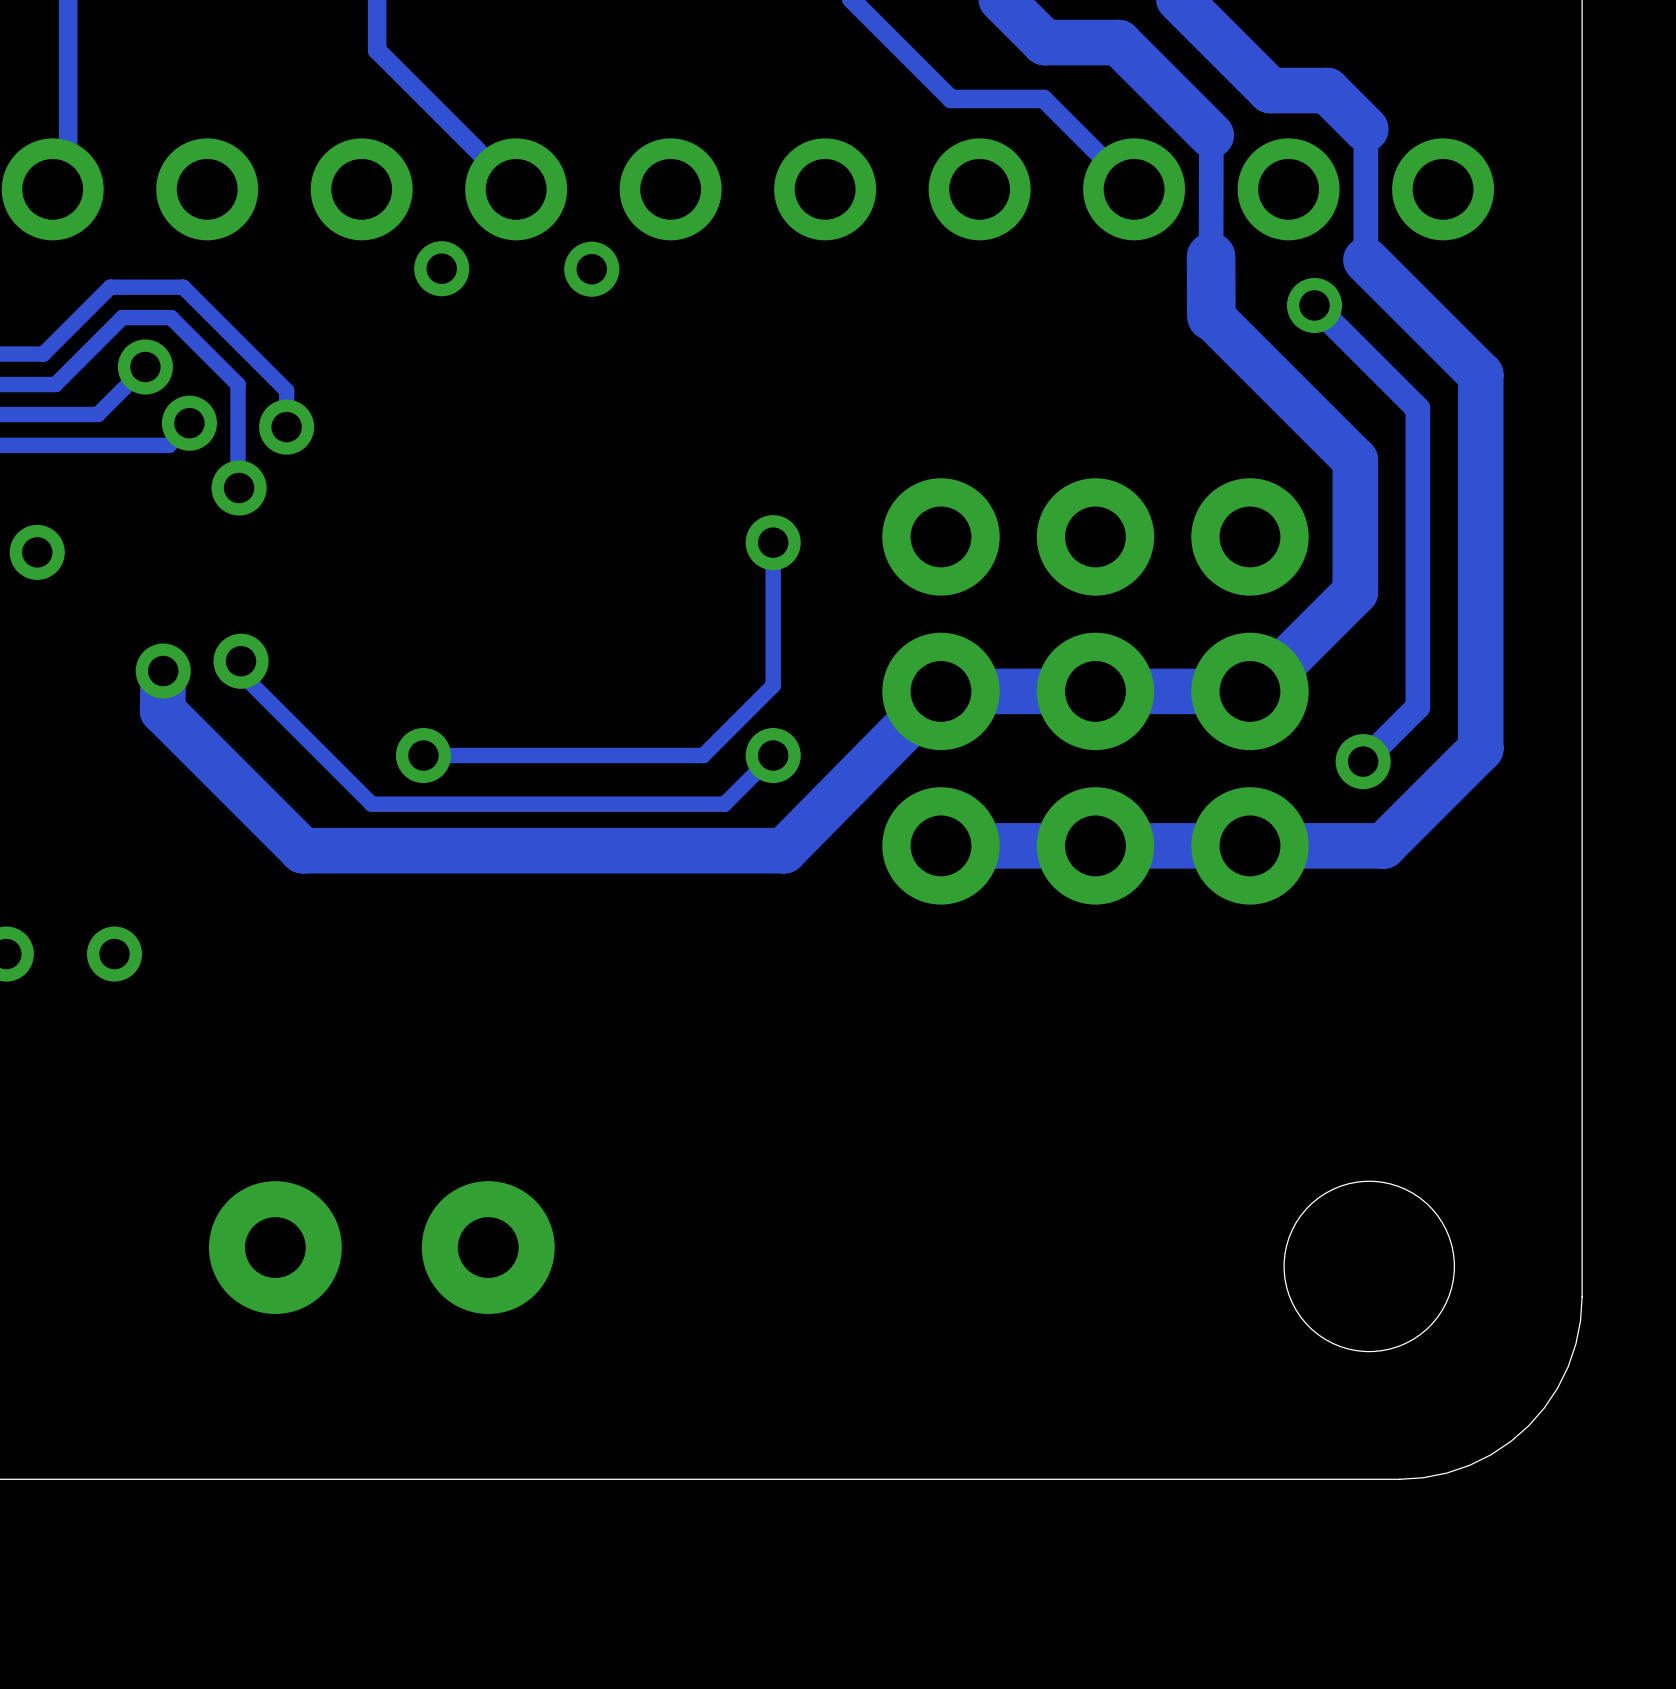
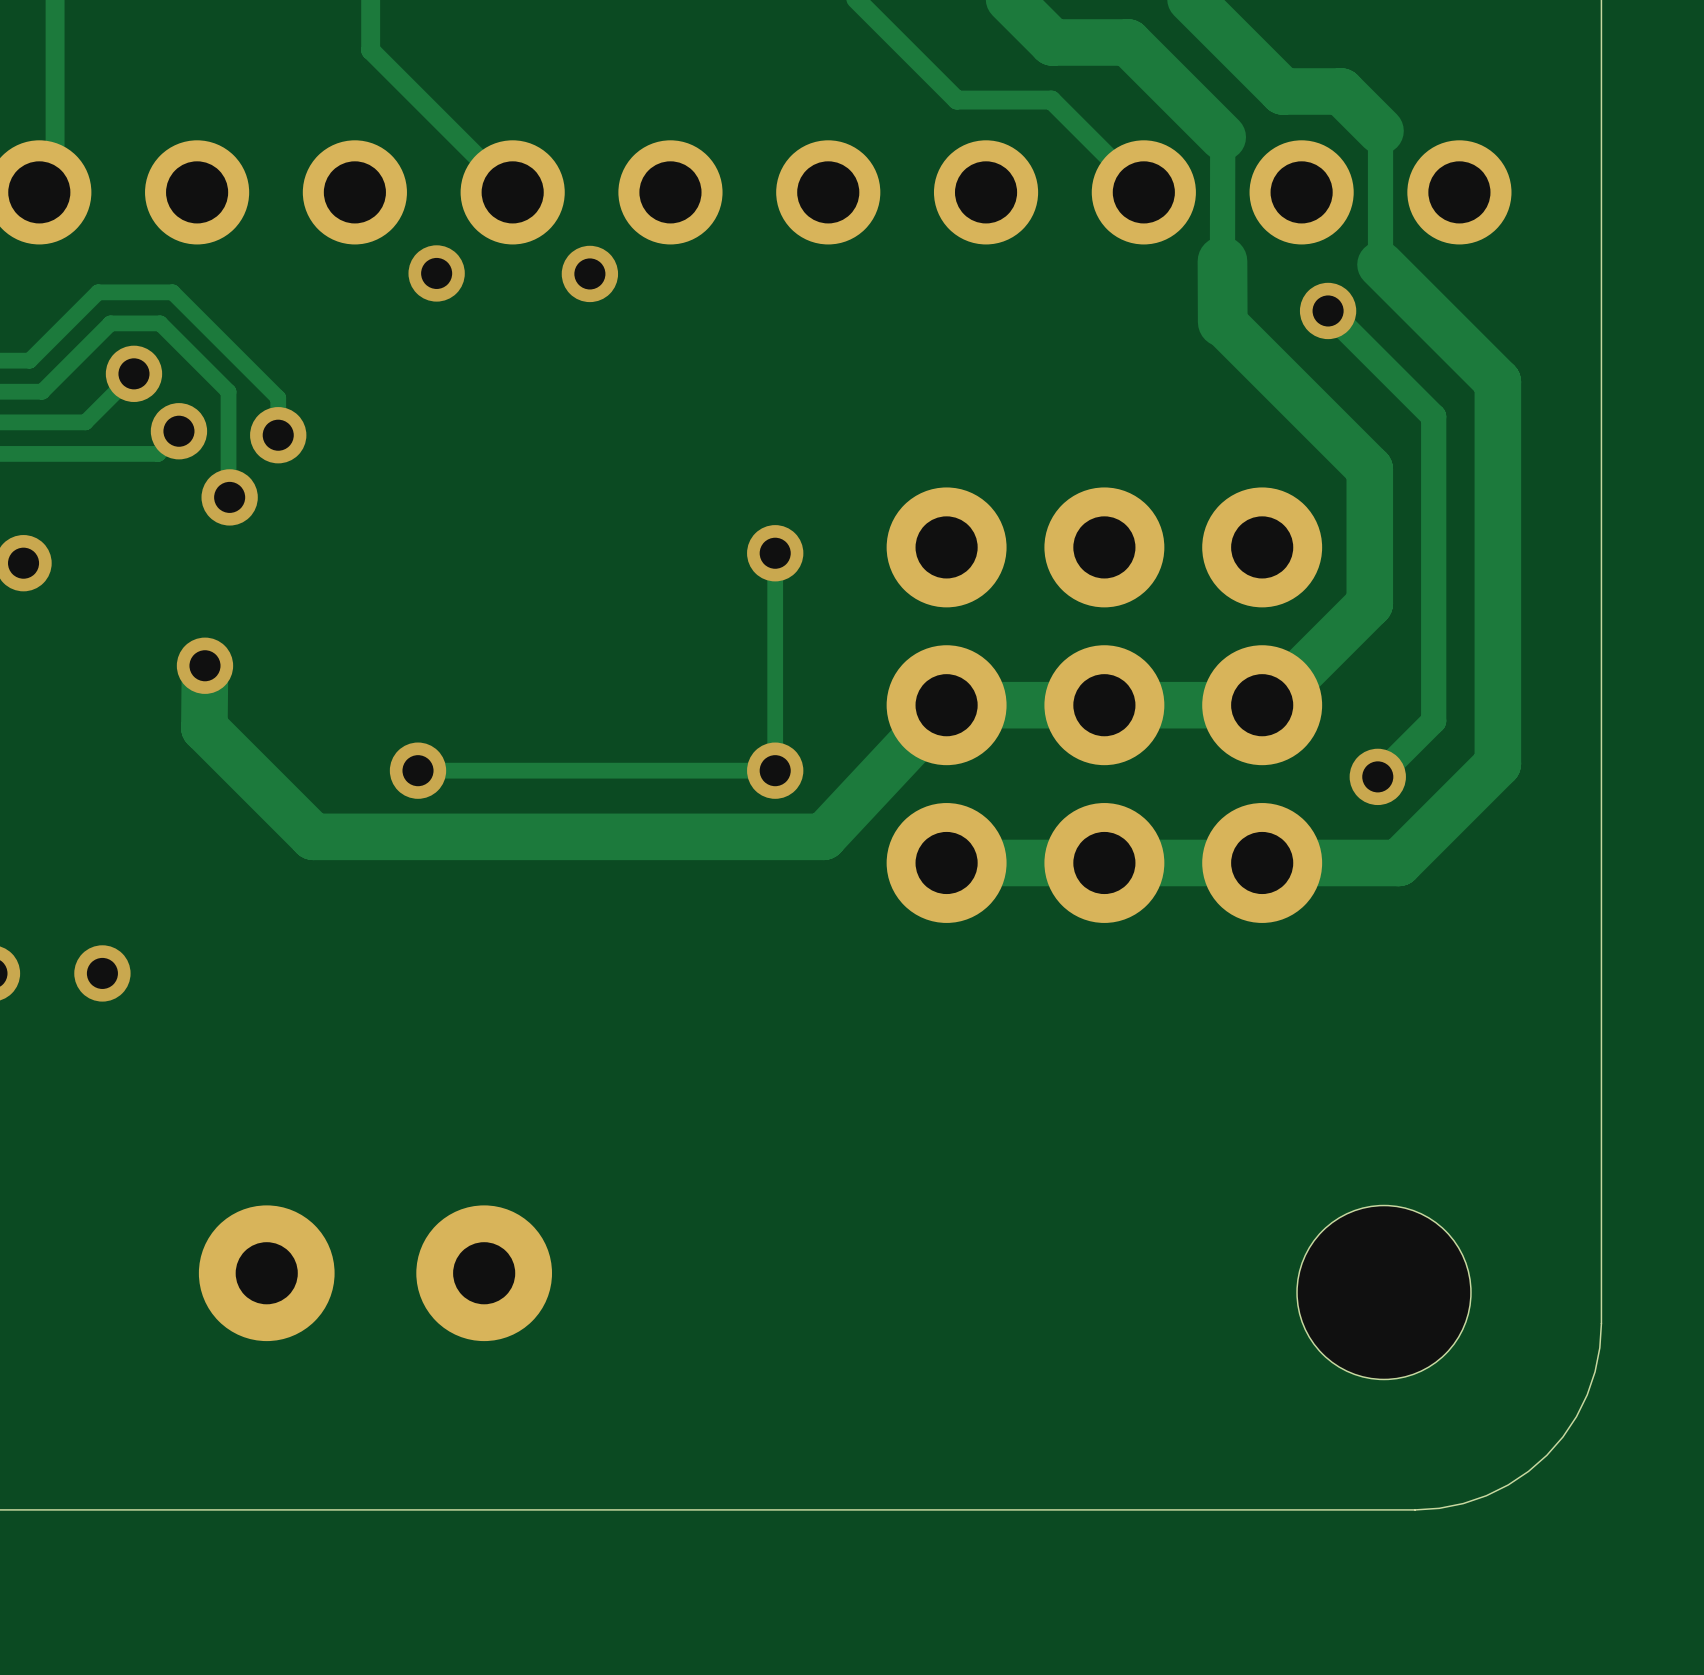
via: none -> (204, 665)
track: (241, 661) (241, 673) (371, 804) (724, 804) (773, 755) -> none
via: (241, 661) -> none
track: (163, 671) (162, 710) (302, 850) (784, 850) (941, 691) -> (204, 665) (204, 727) (313, 836) (823, 836) (946, 705)
via: (163, 671) -> none
track: (773, 685) (703, 755) -> (775, 699) (775, 770) (703, 770)

